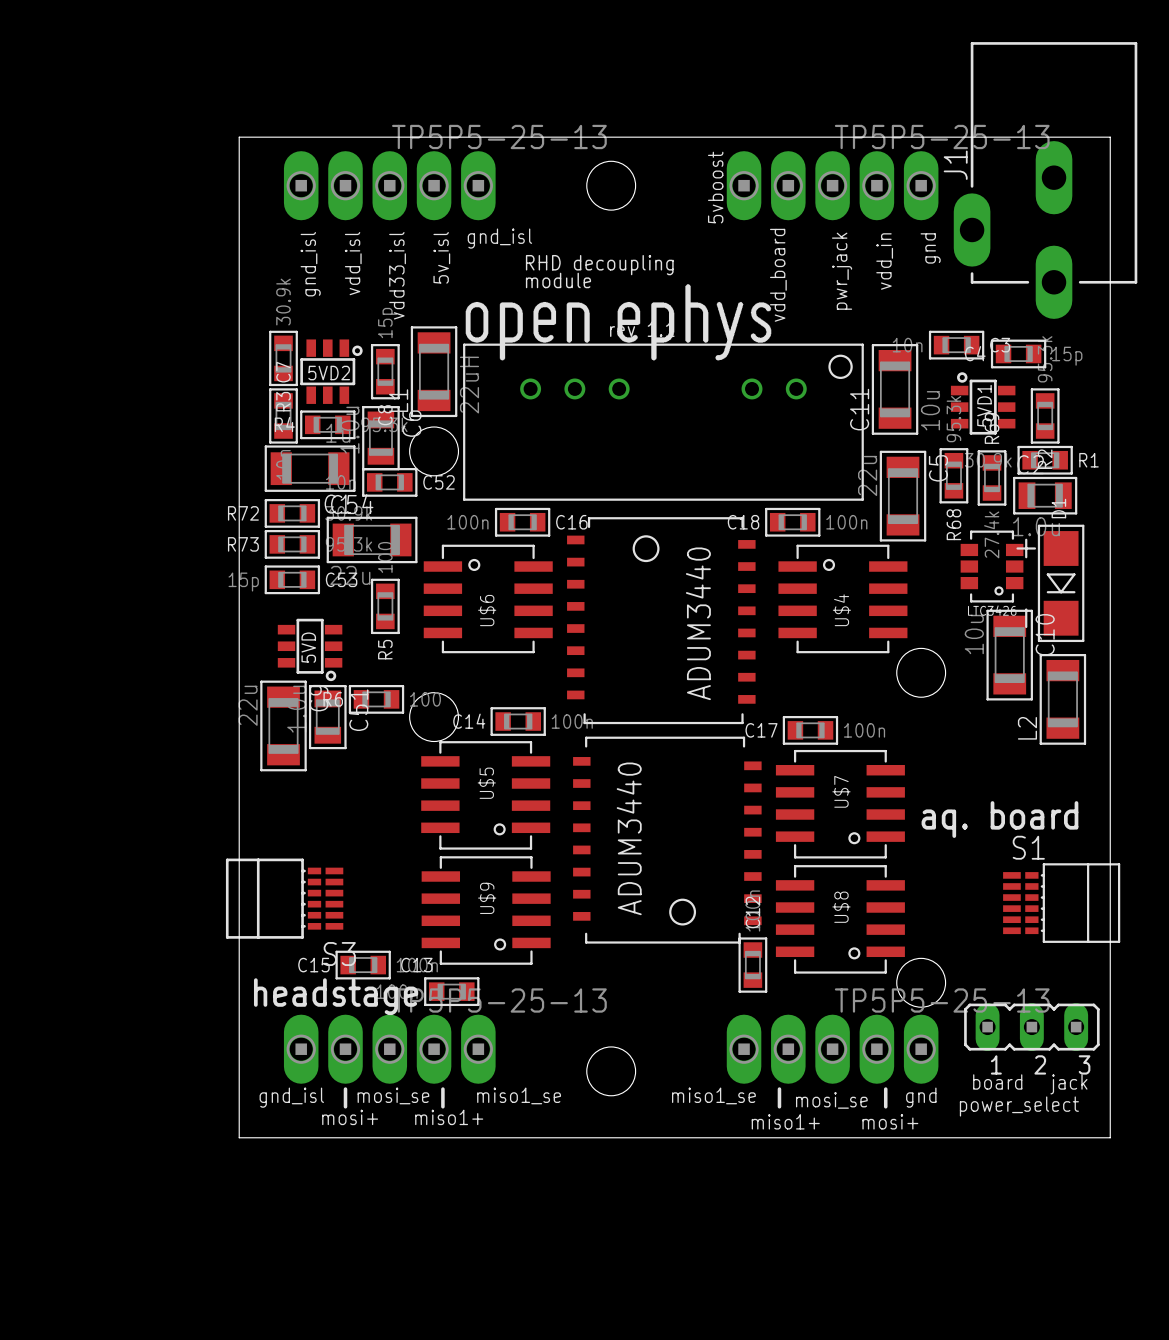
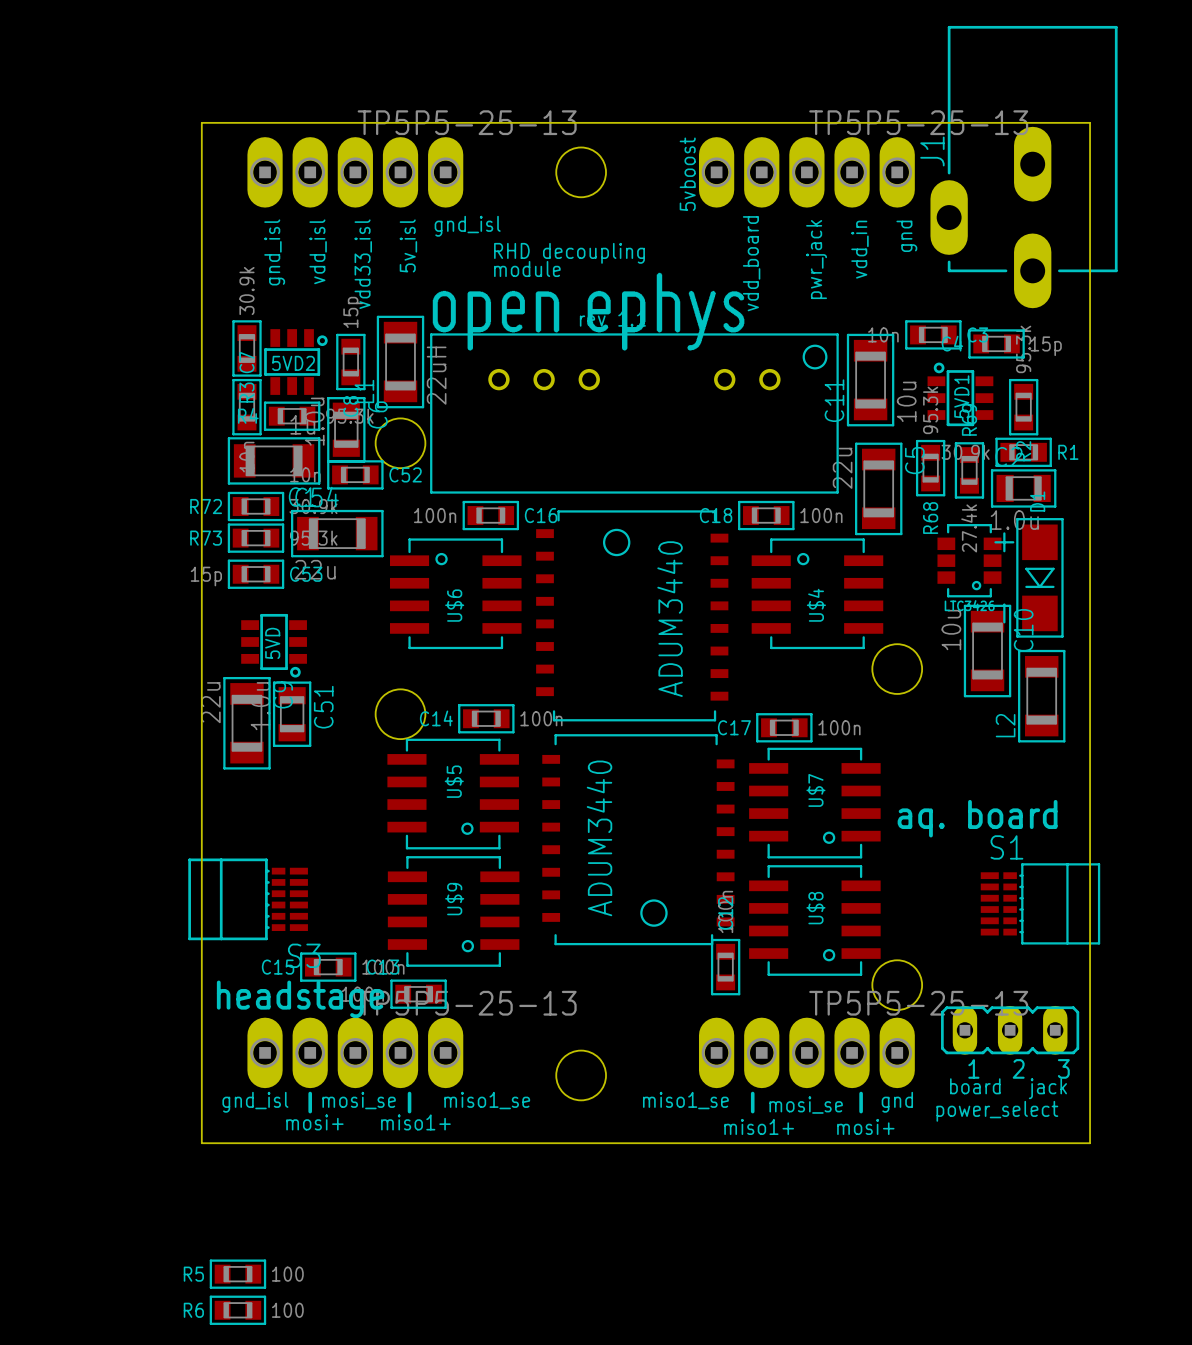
R5 rotation: 0° (385, 606) -> 90° clockwise (237, 1274)
R5 position: (385, 606) -> (237, 1274)
R6 position: (376, 699) -> (237, 1310)

